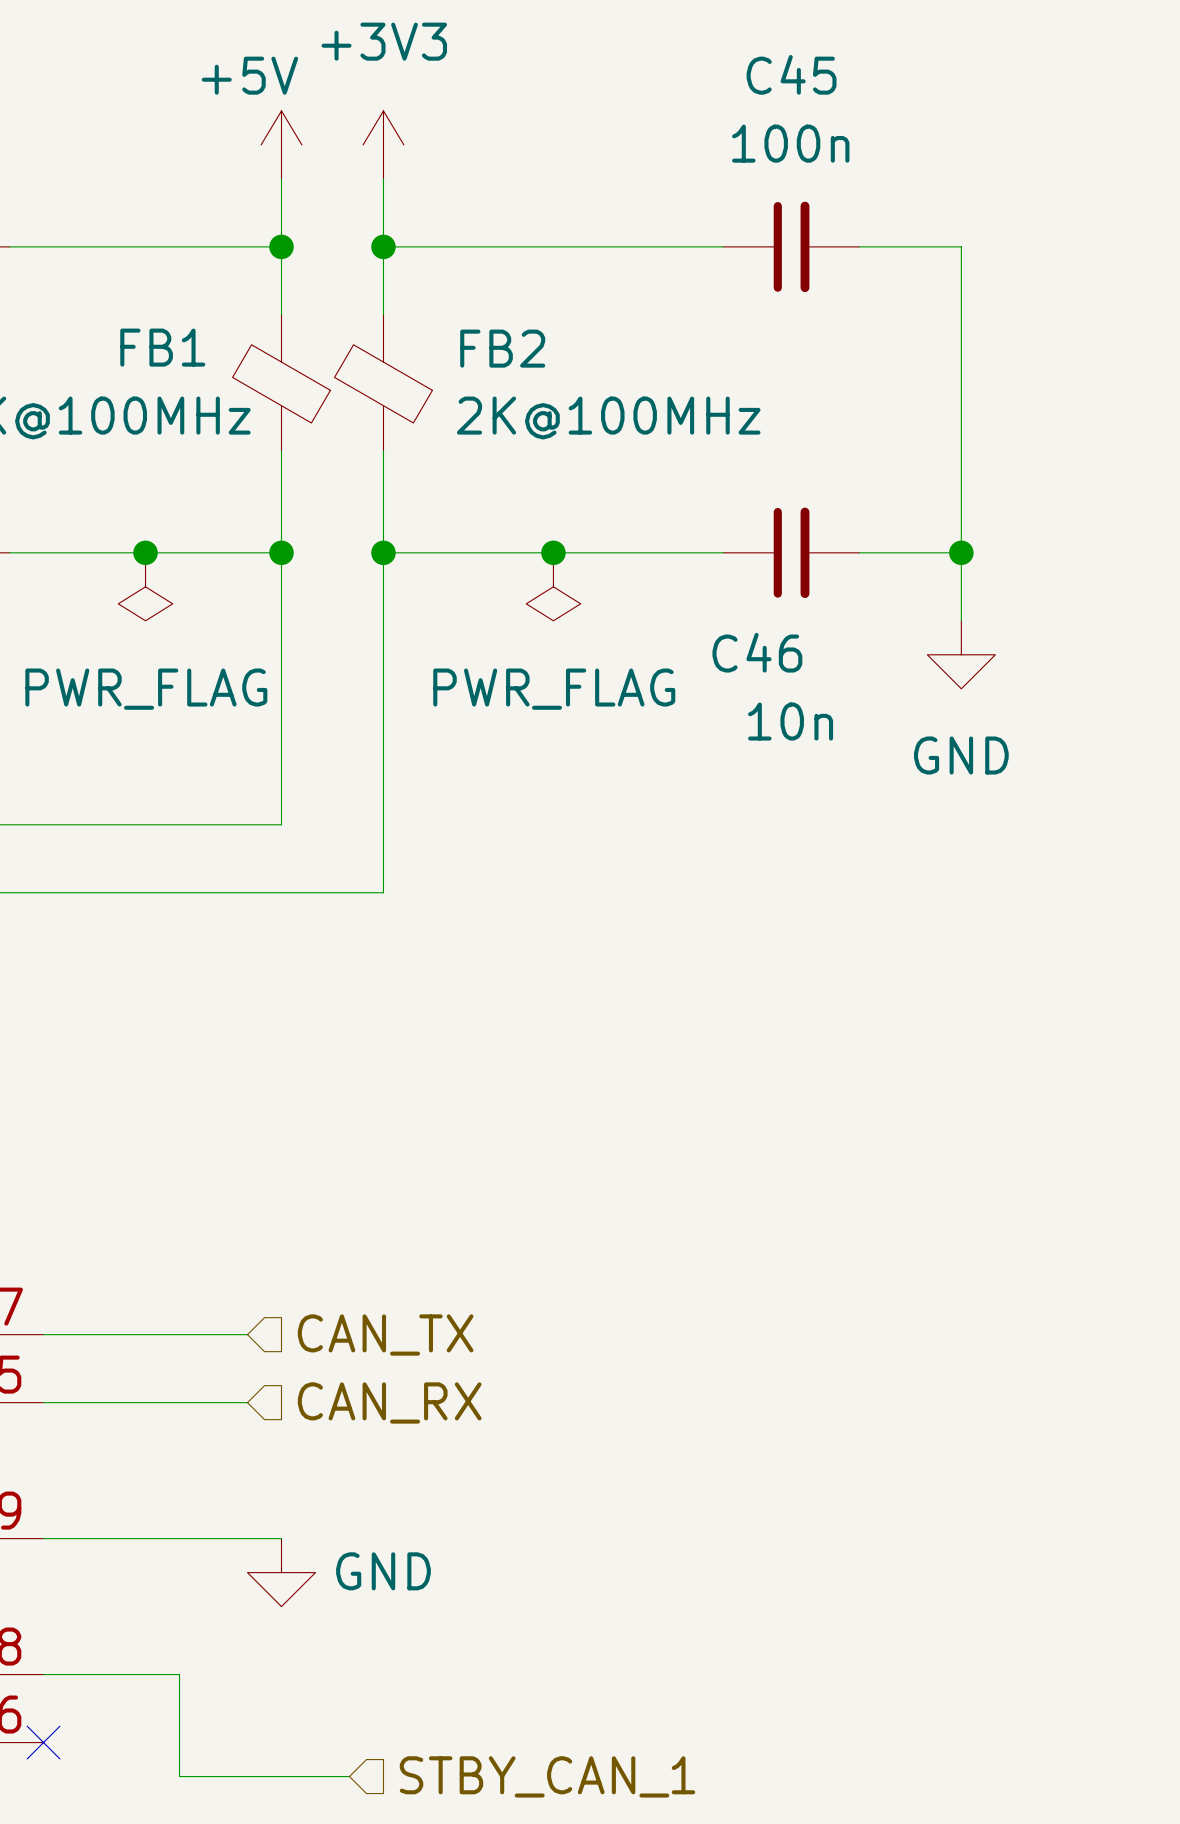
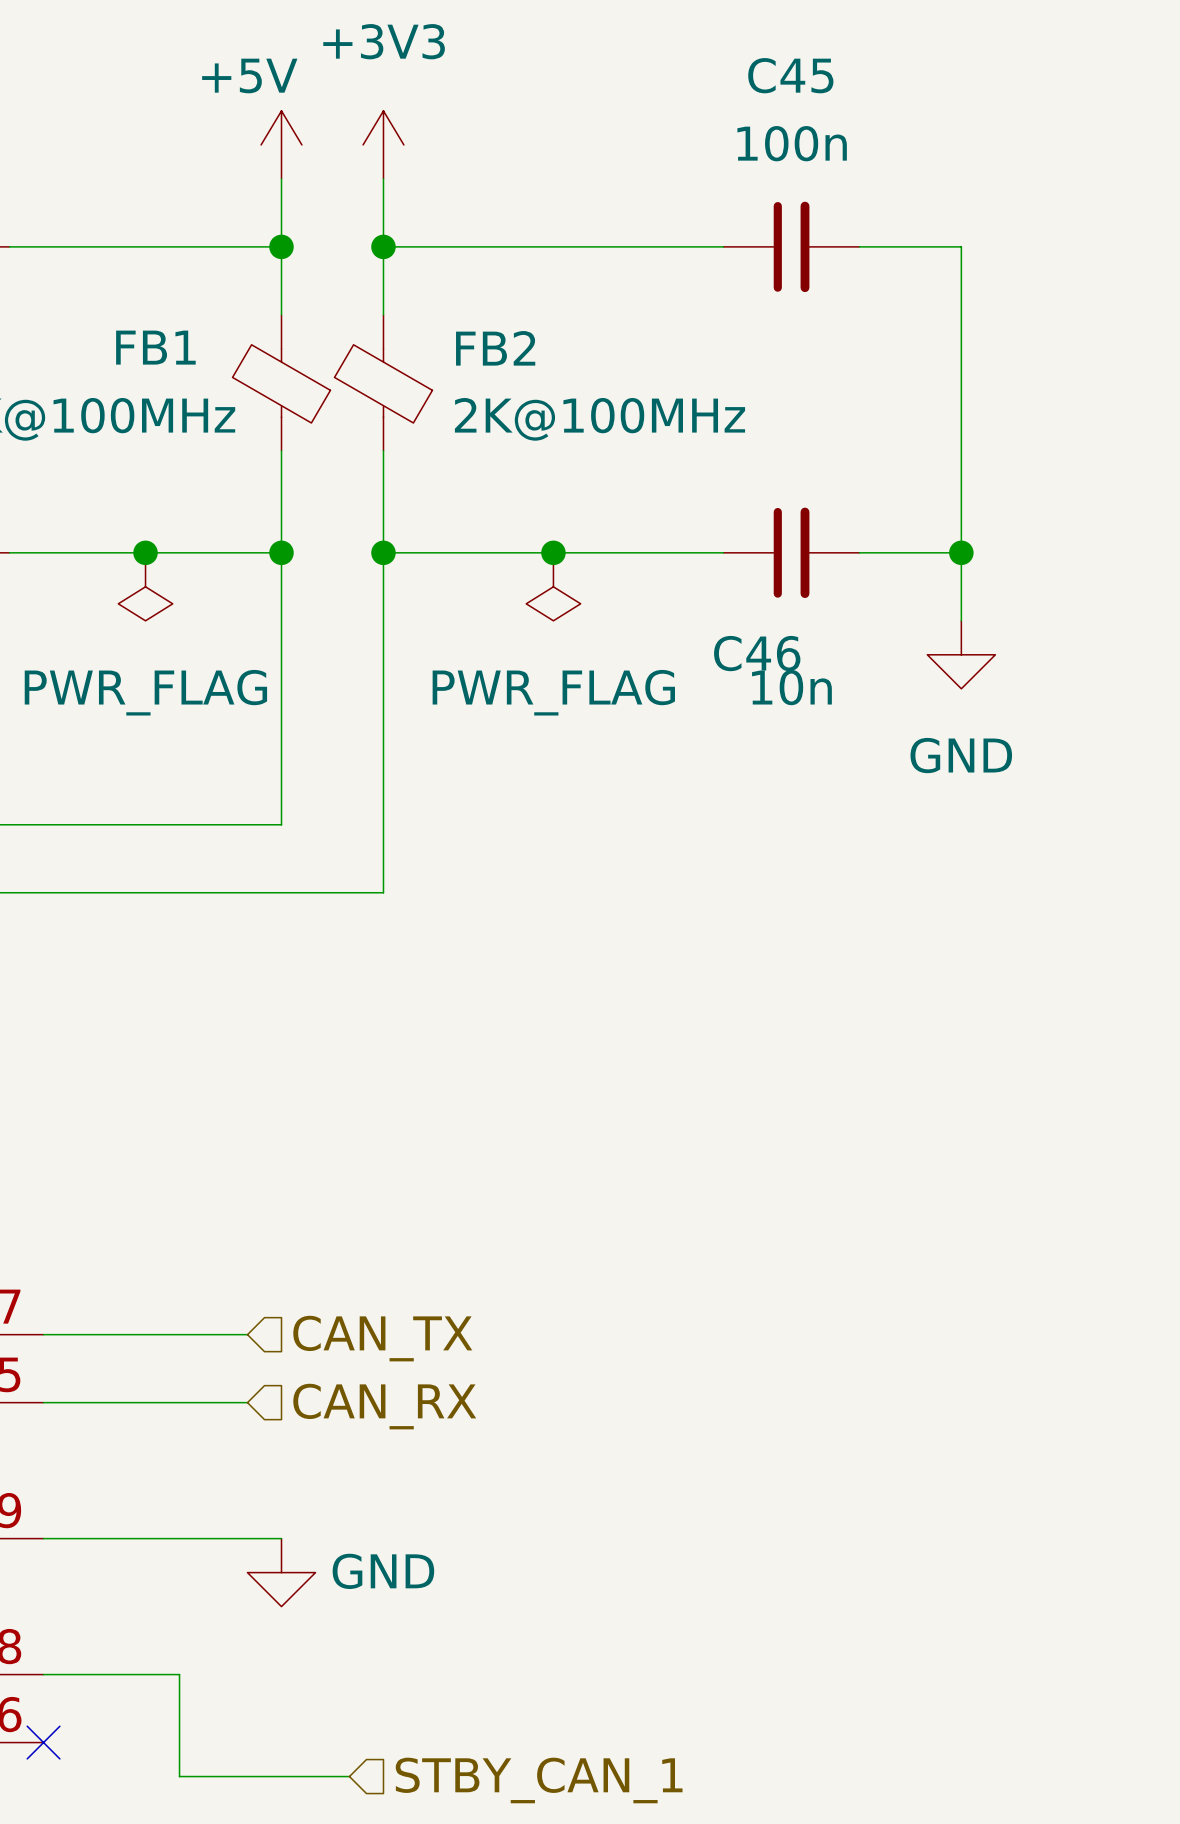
C46 value position: 10n (790, 721) -> 10n (791, 687)

